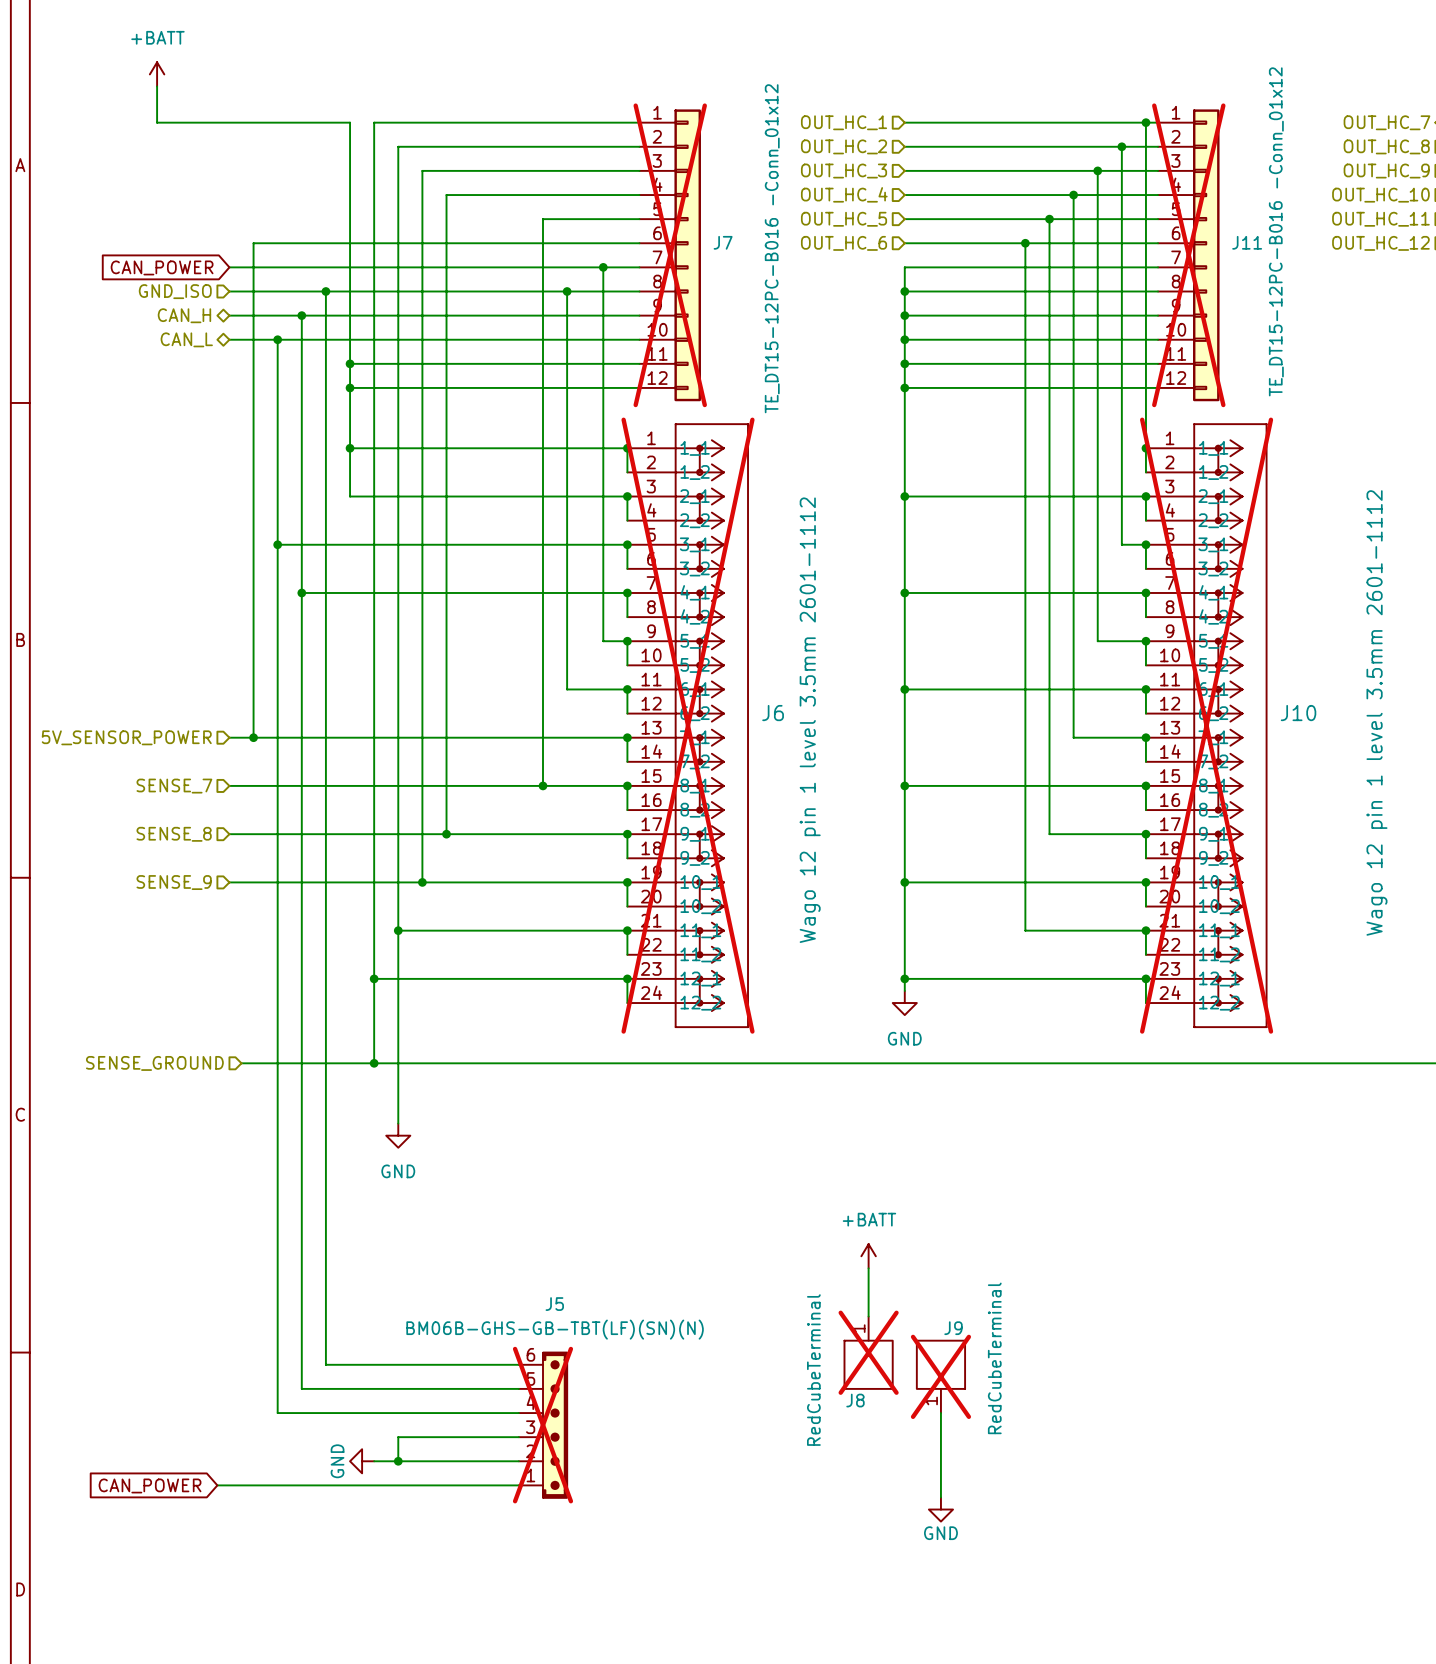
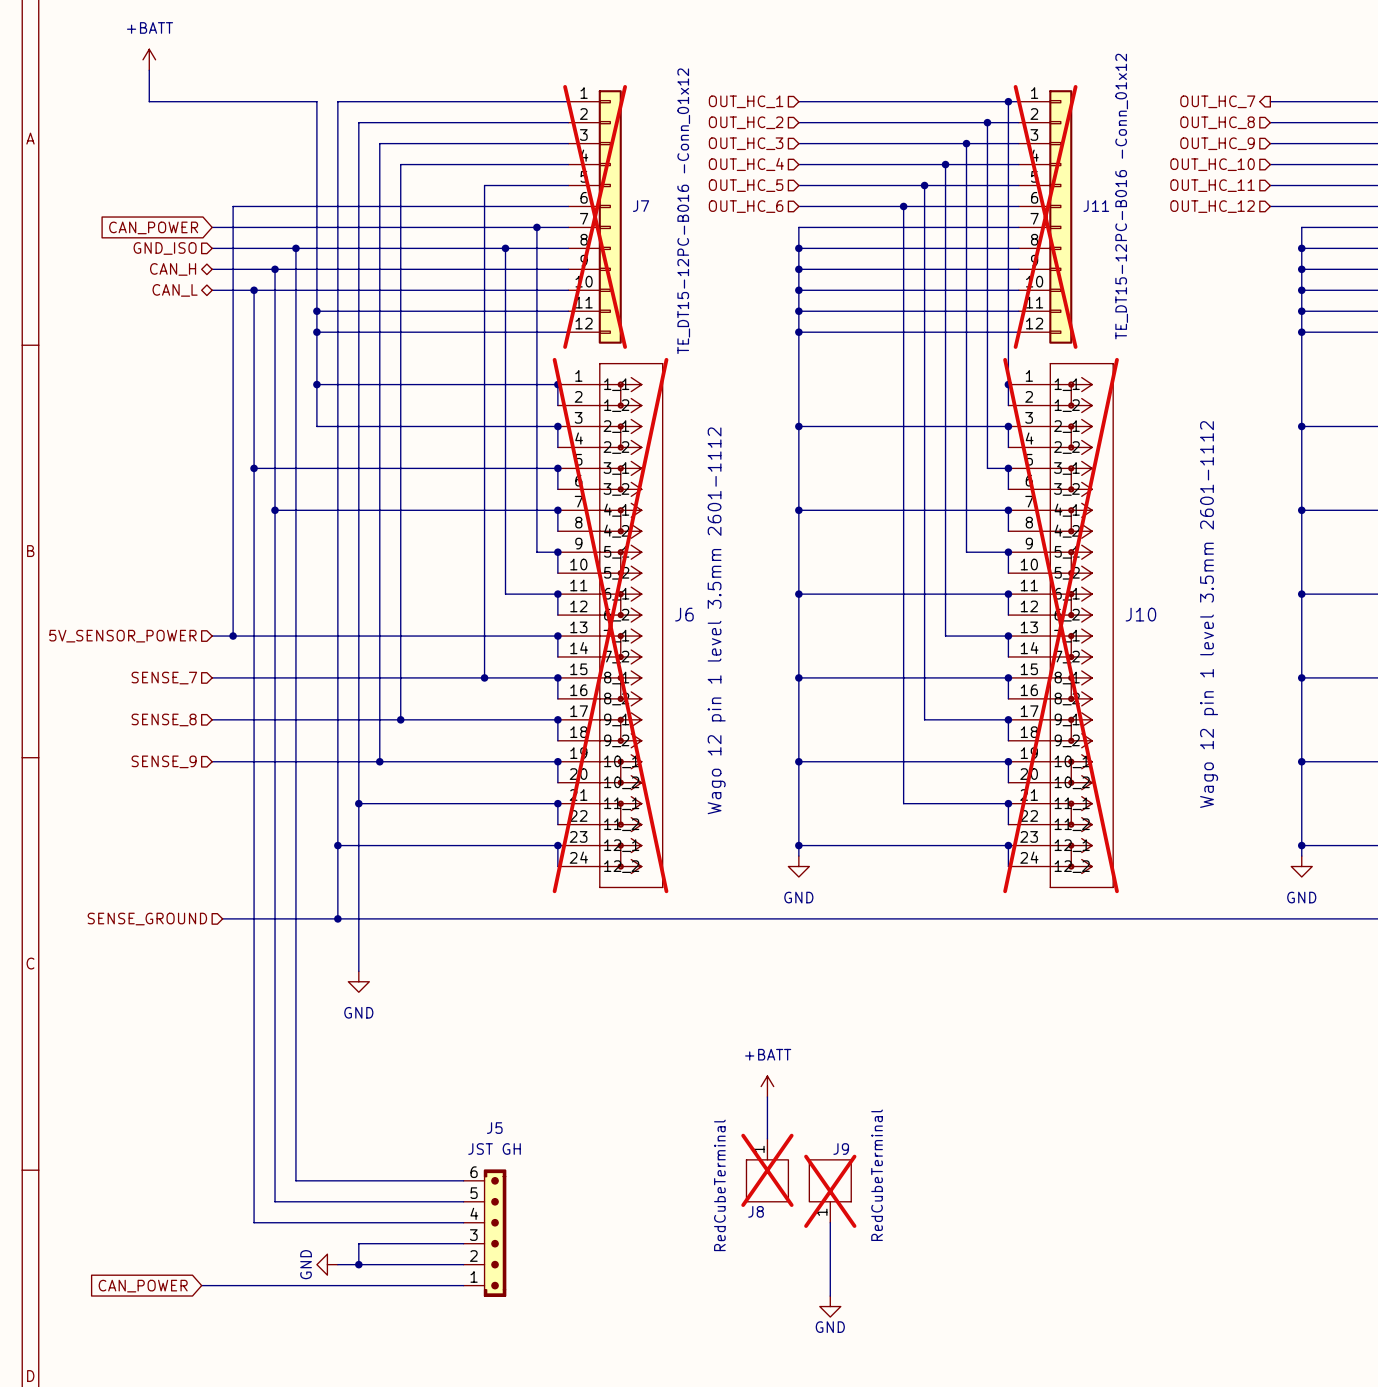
J5 value: BM06B-GHS-GB-TBT(LF)(SN)(N) (555, 1329) -> JST GH (494, 1149)
J5 do-not-place cross: (542, 1425) -> none

